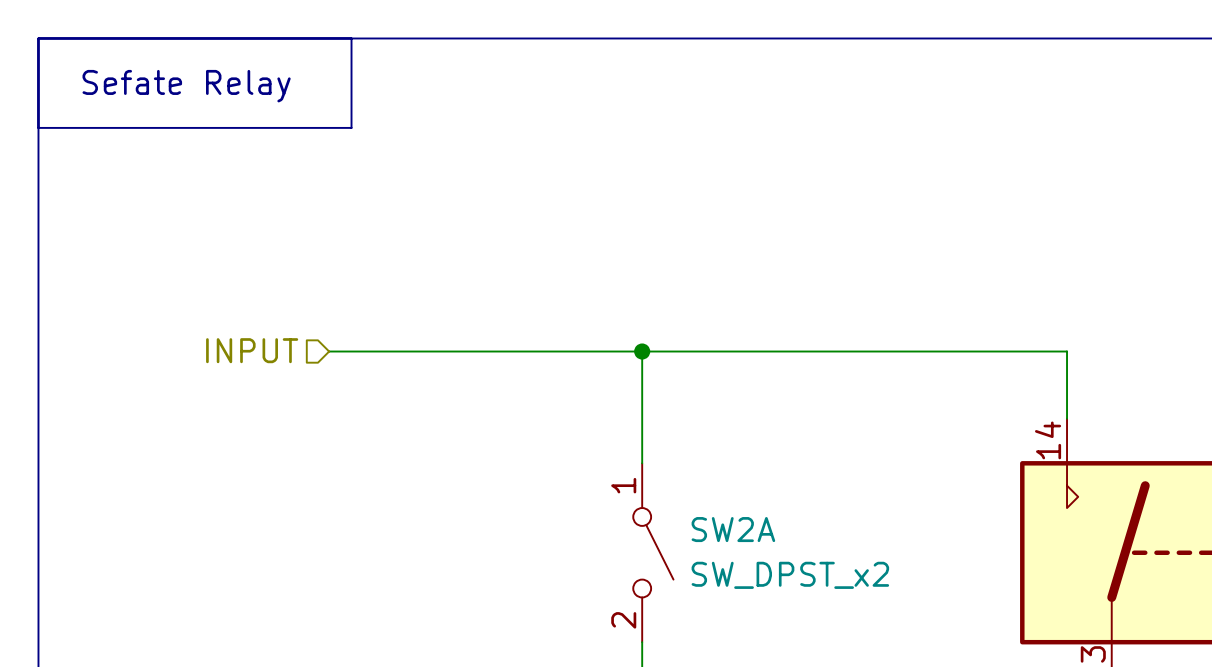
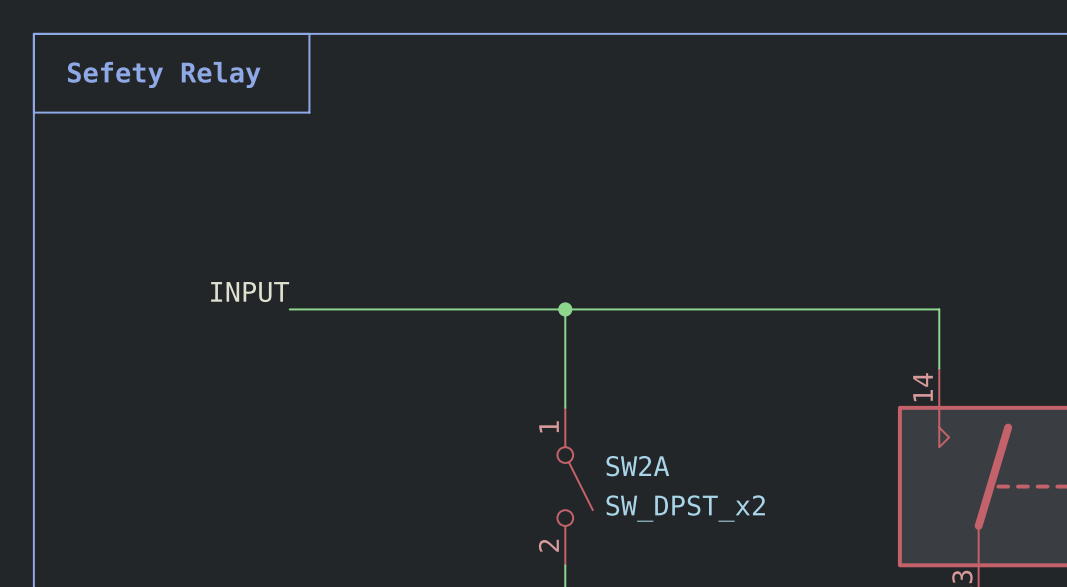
text: Sefate Relay (186, 86) -> Sefety Relay (164, 74)
label: none -> INPUT (250, 292)
hierarchical label: INPUT (252, 350) -> none

